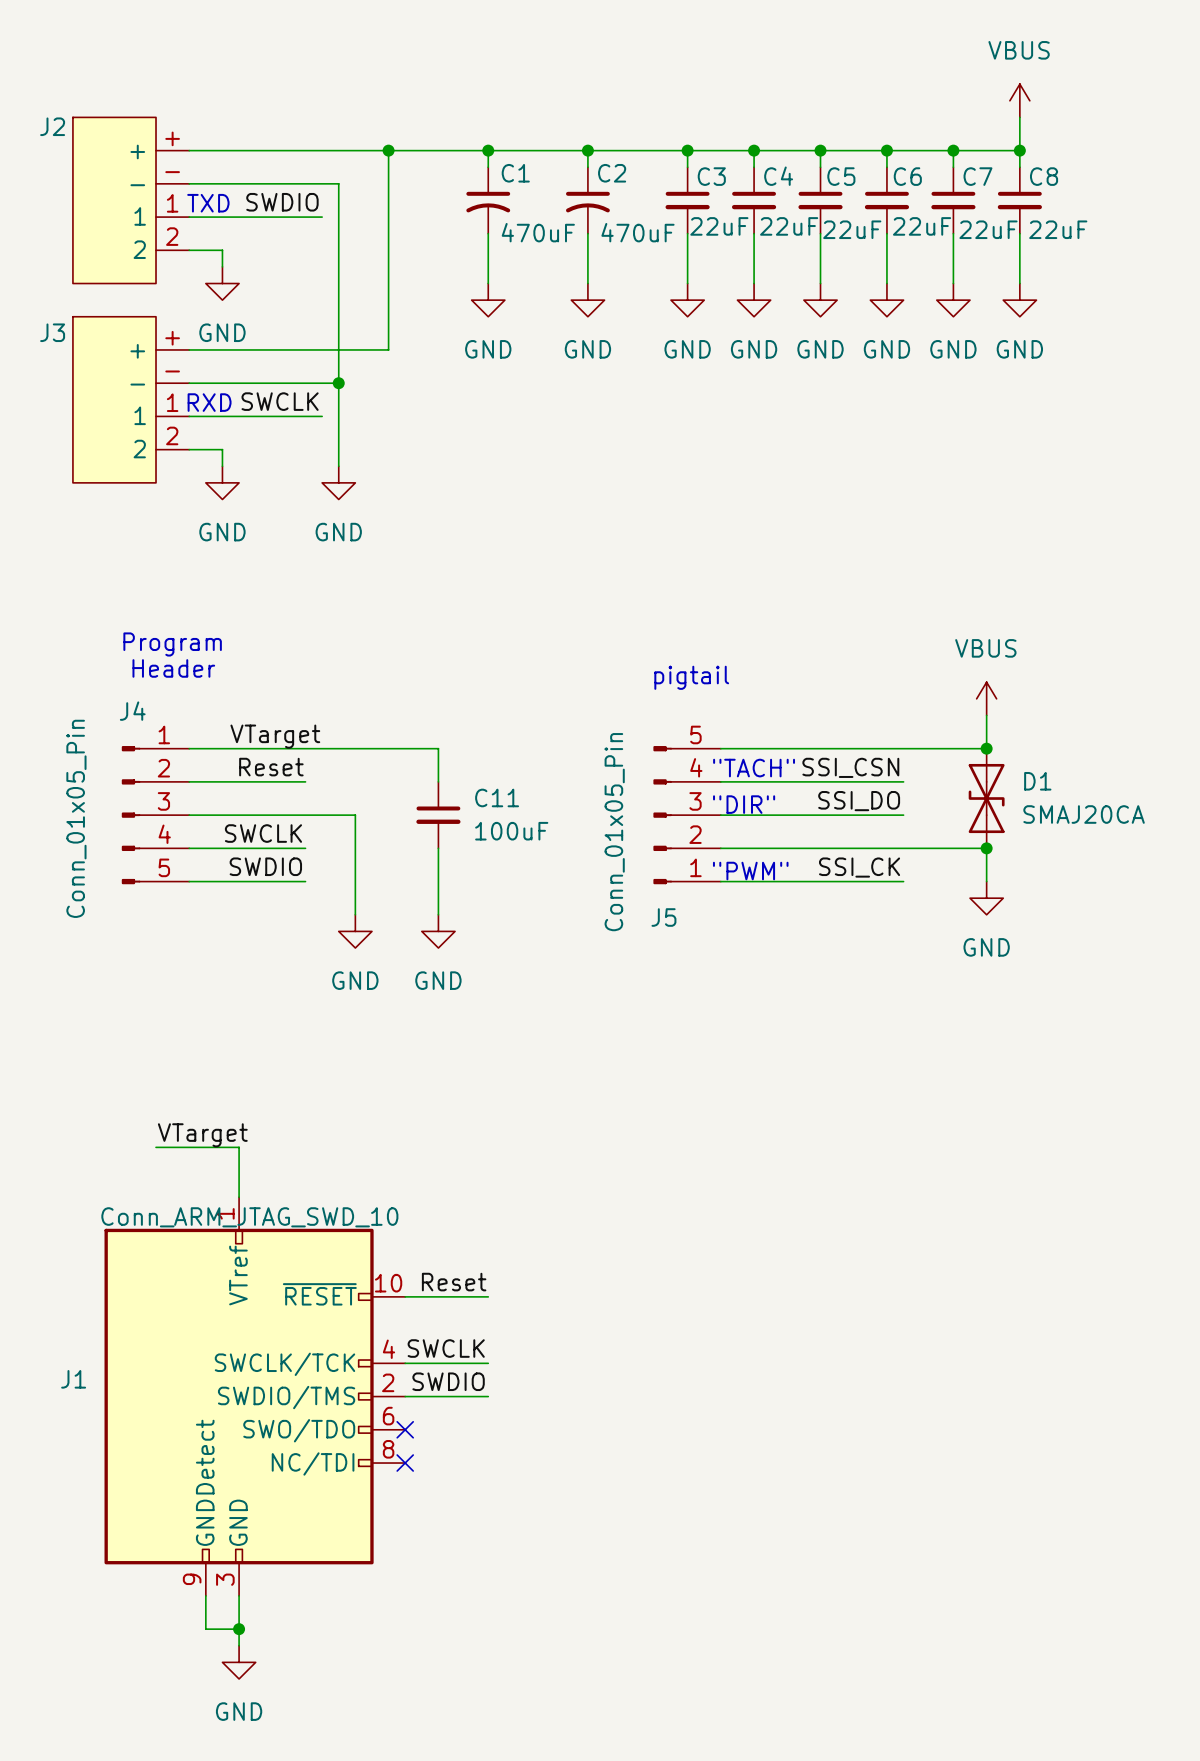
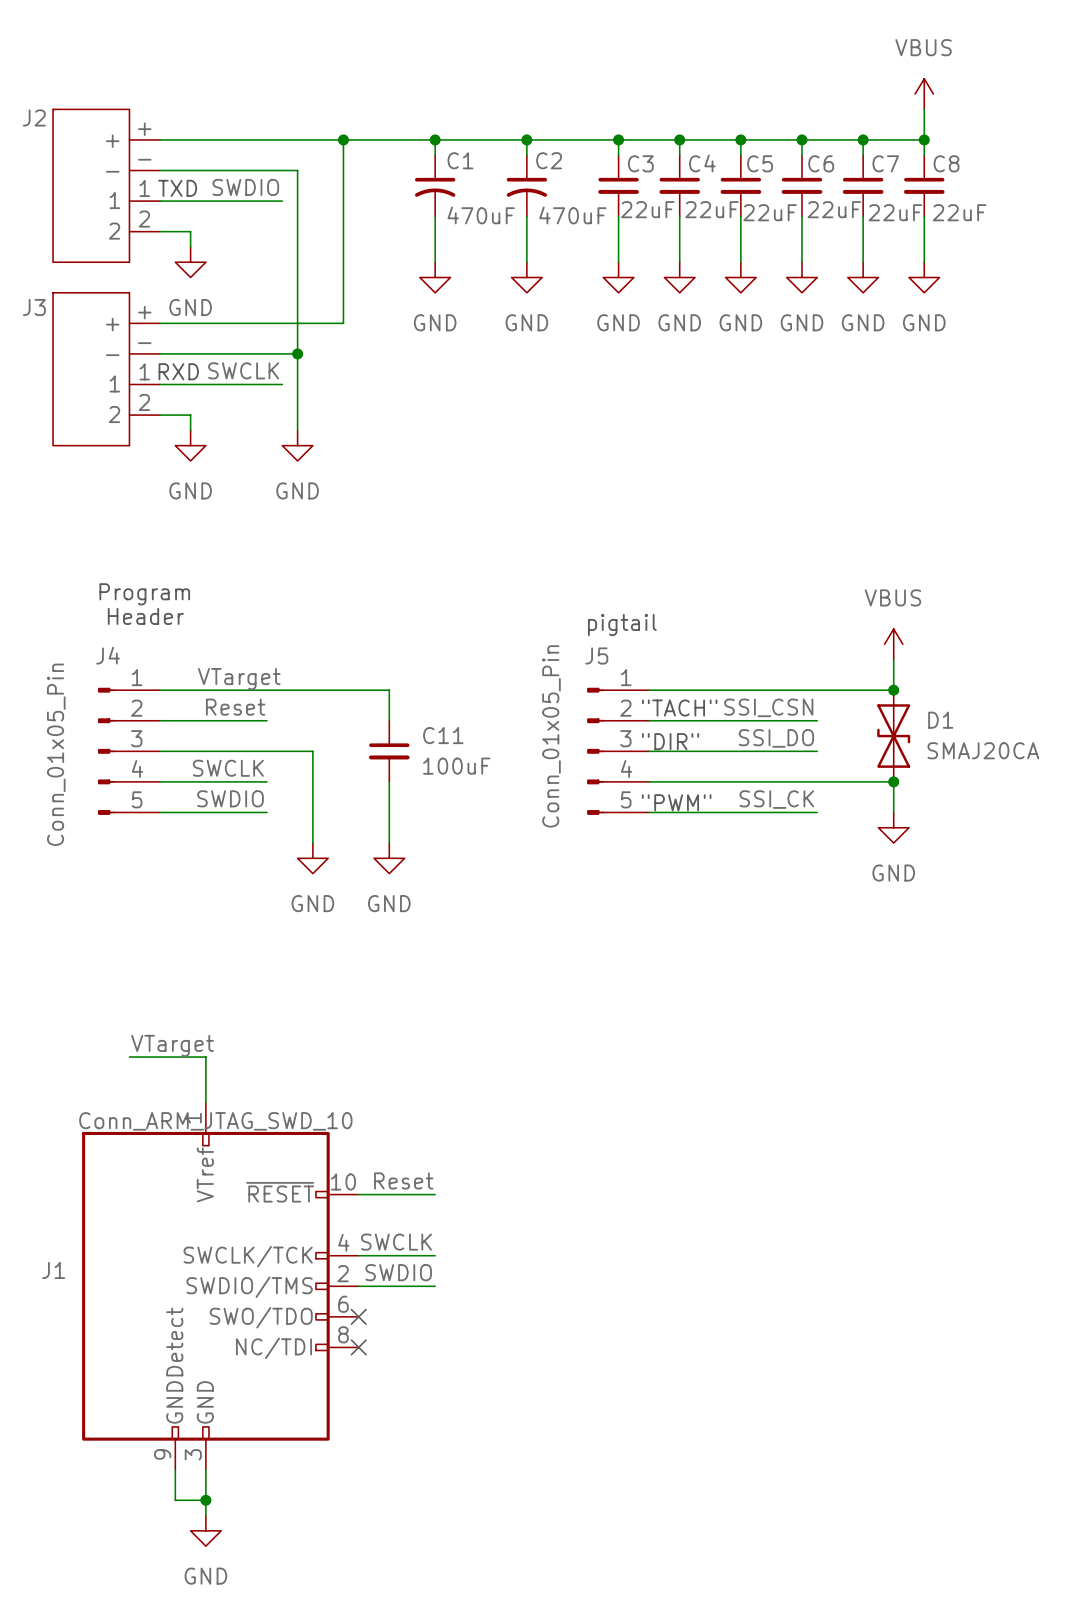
J5 flip: as is (662, 815) -> up-down (595, 751)

